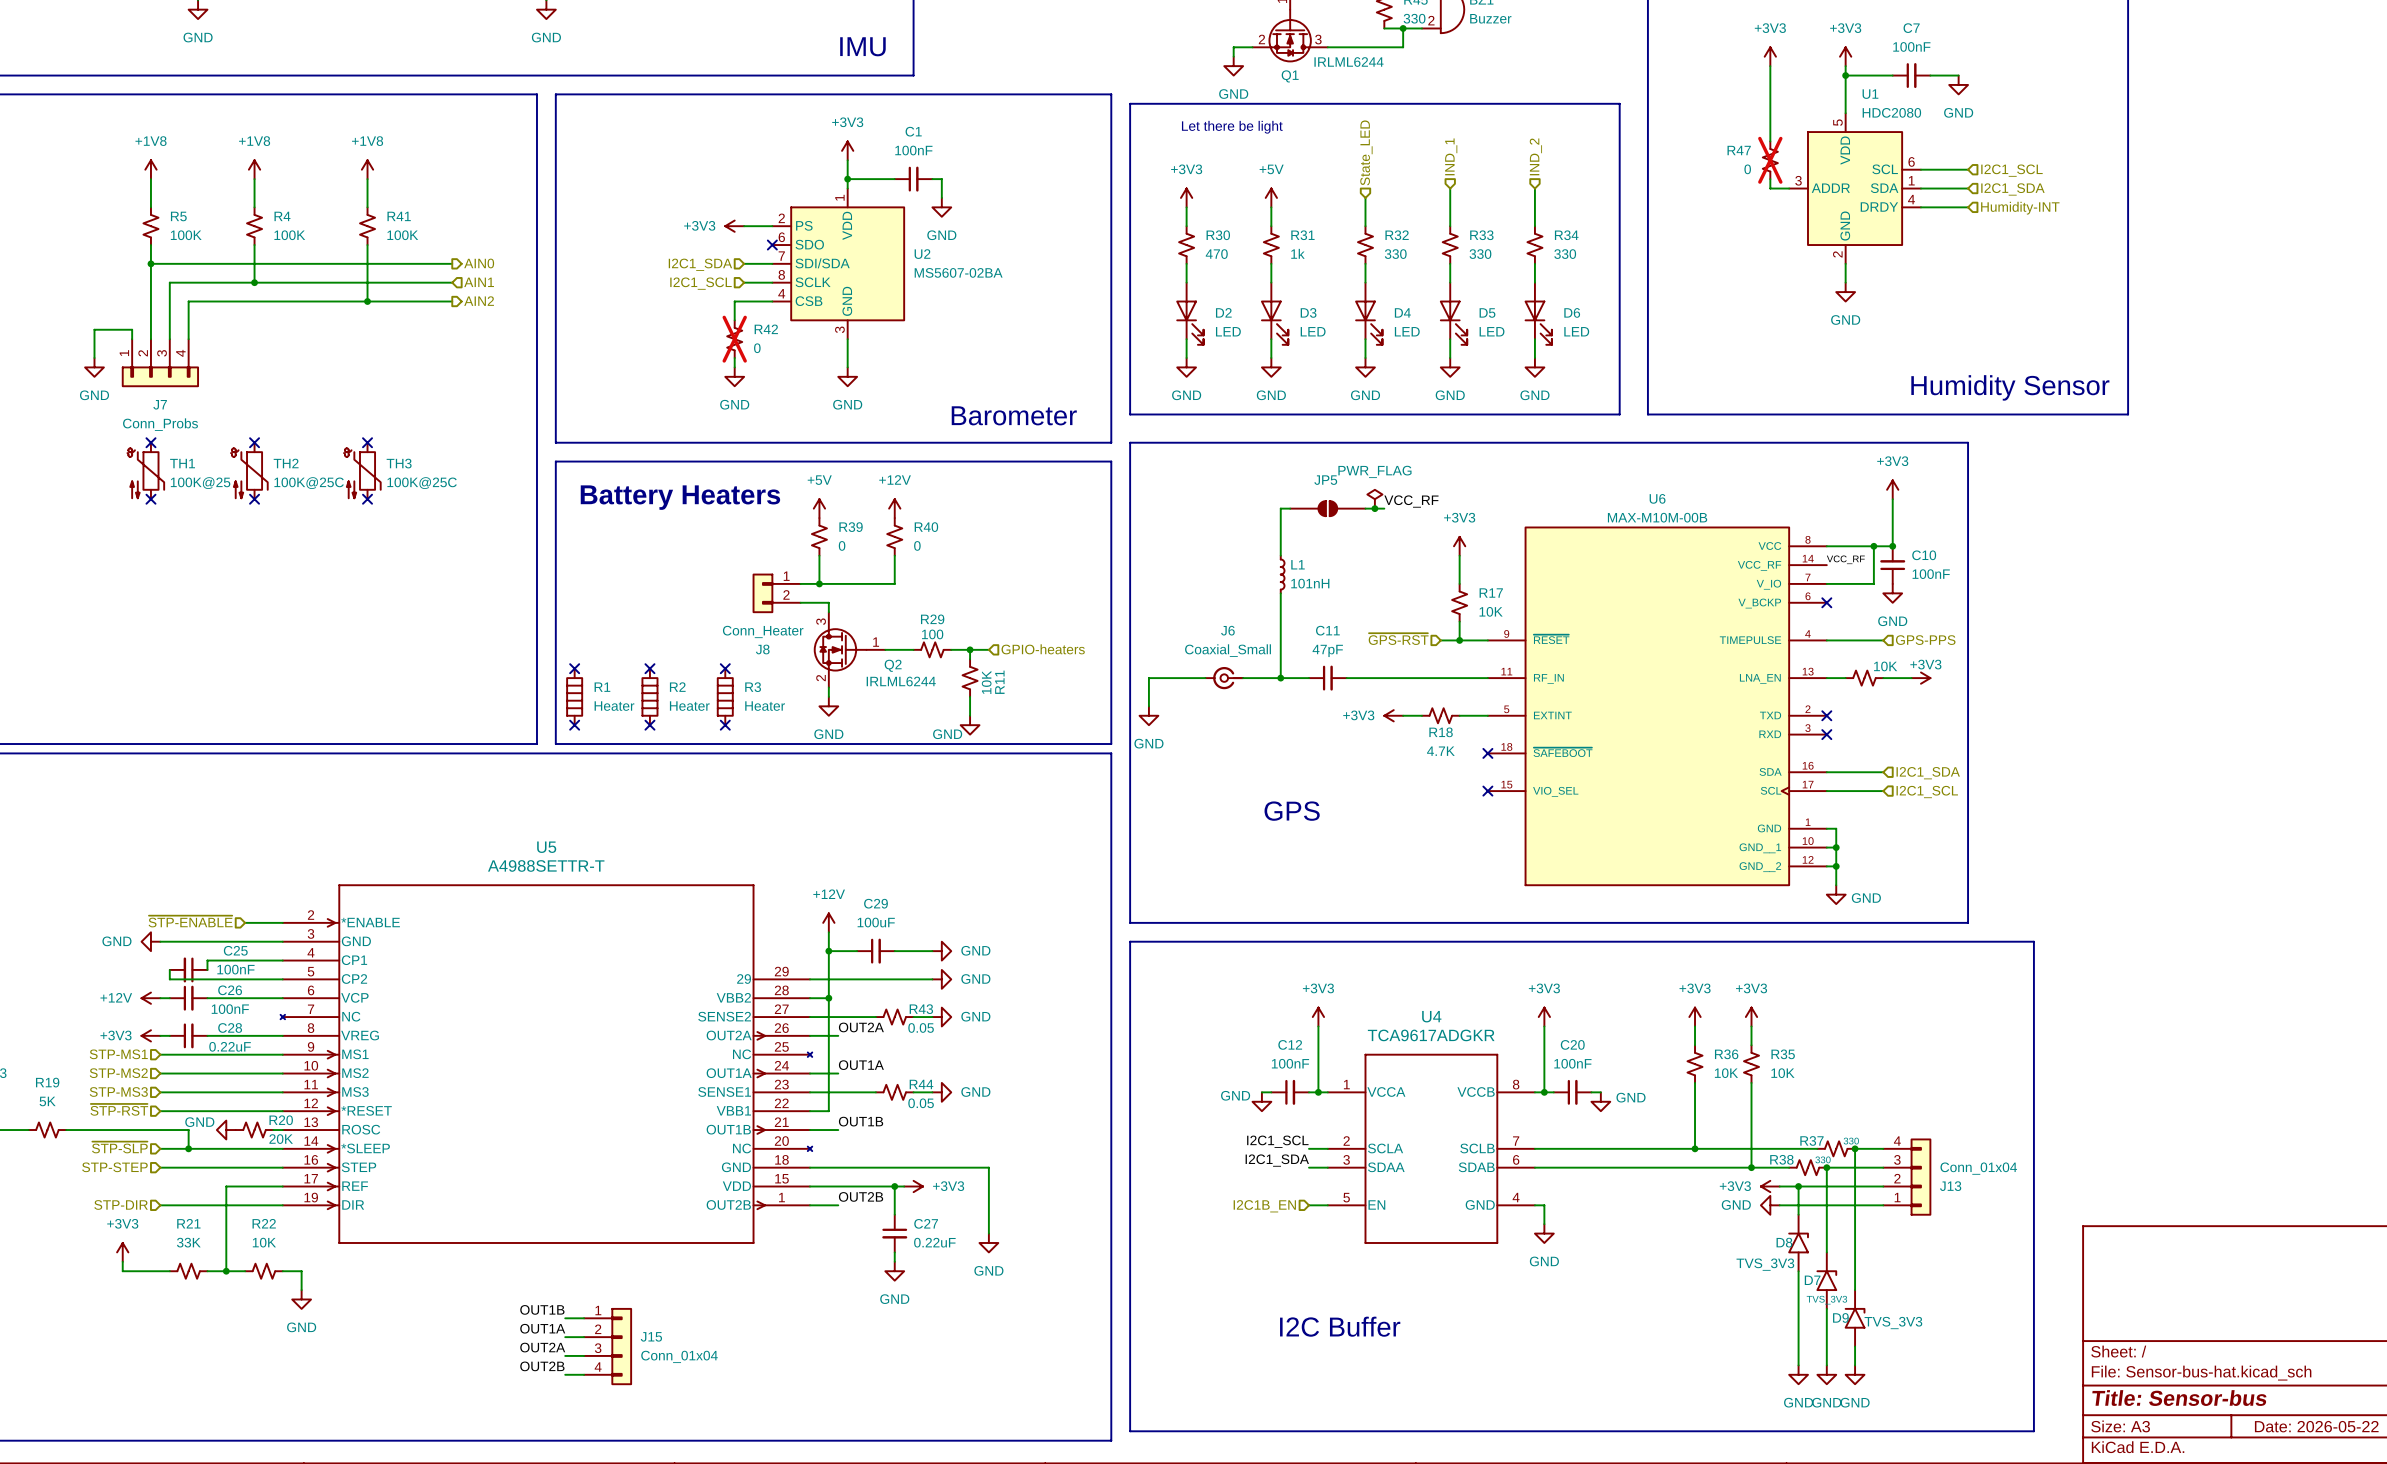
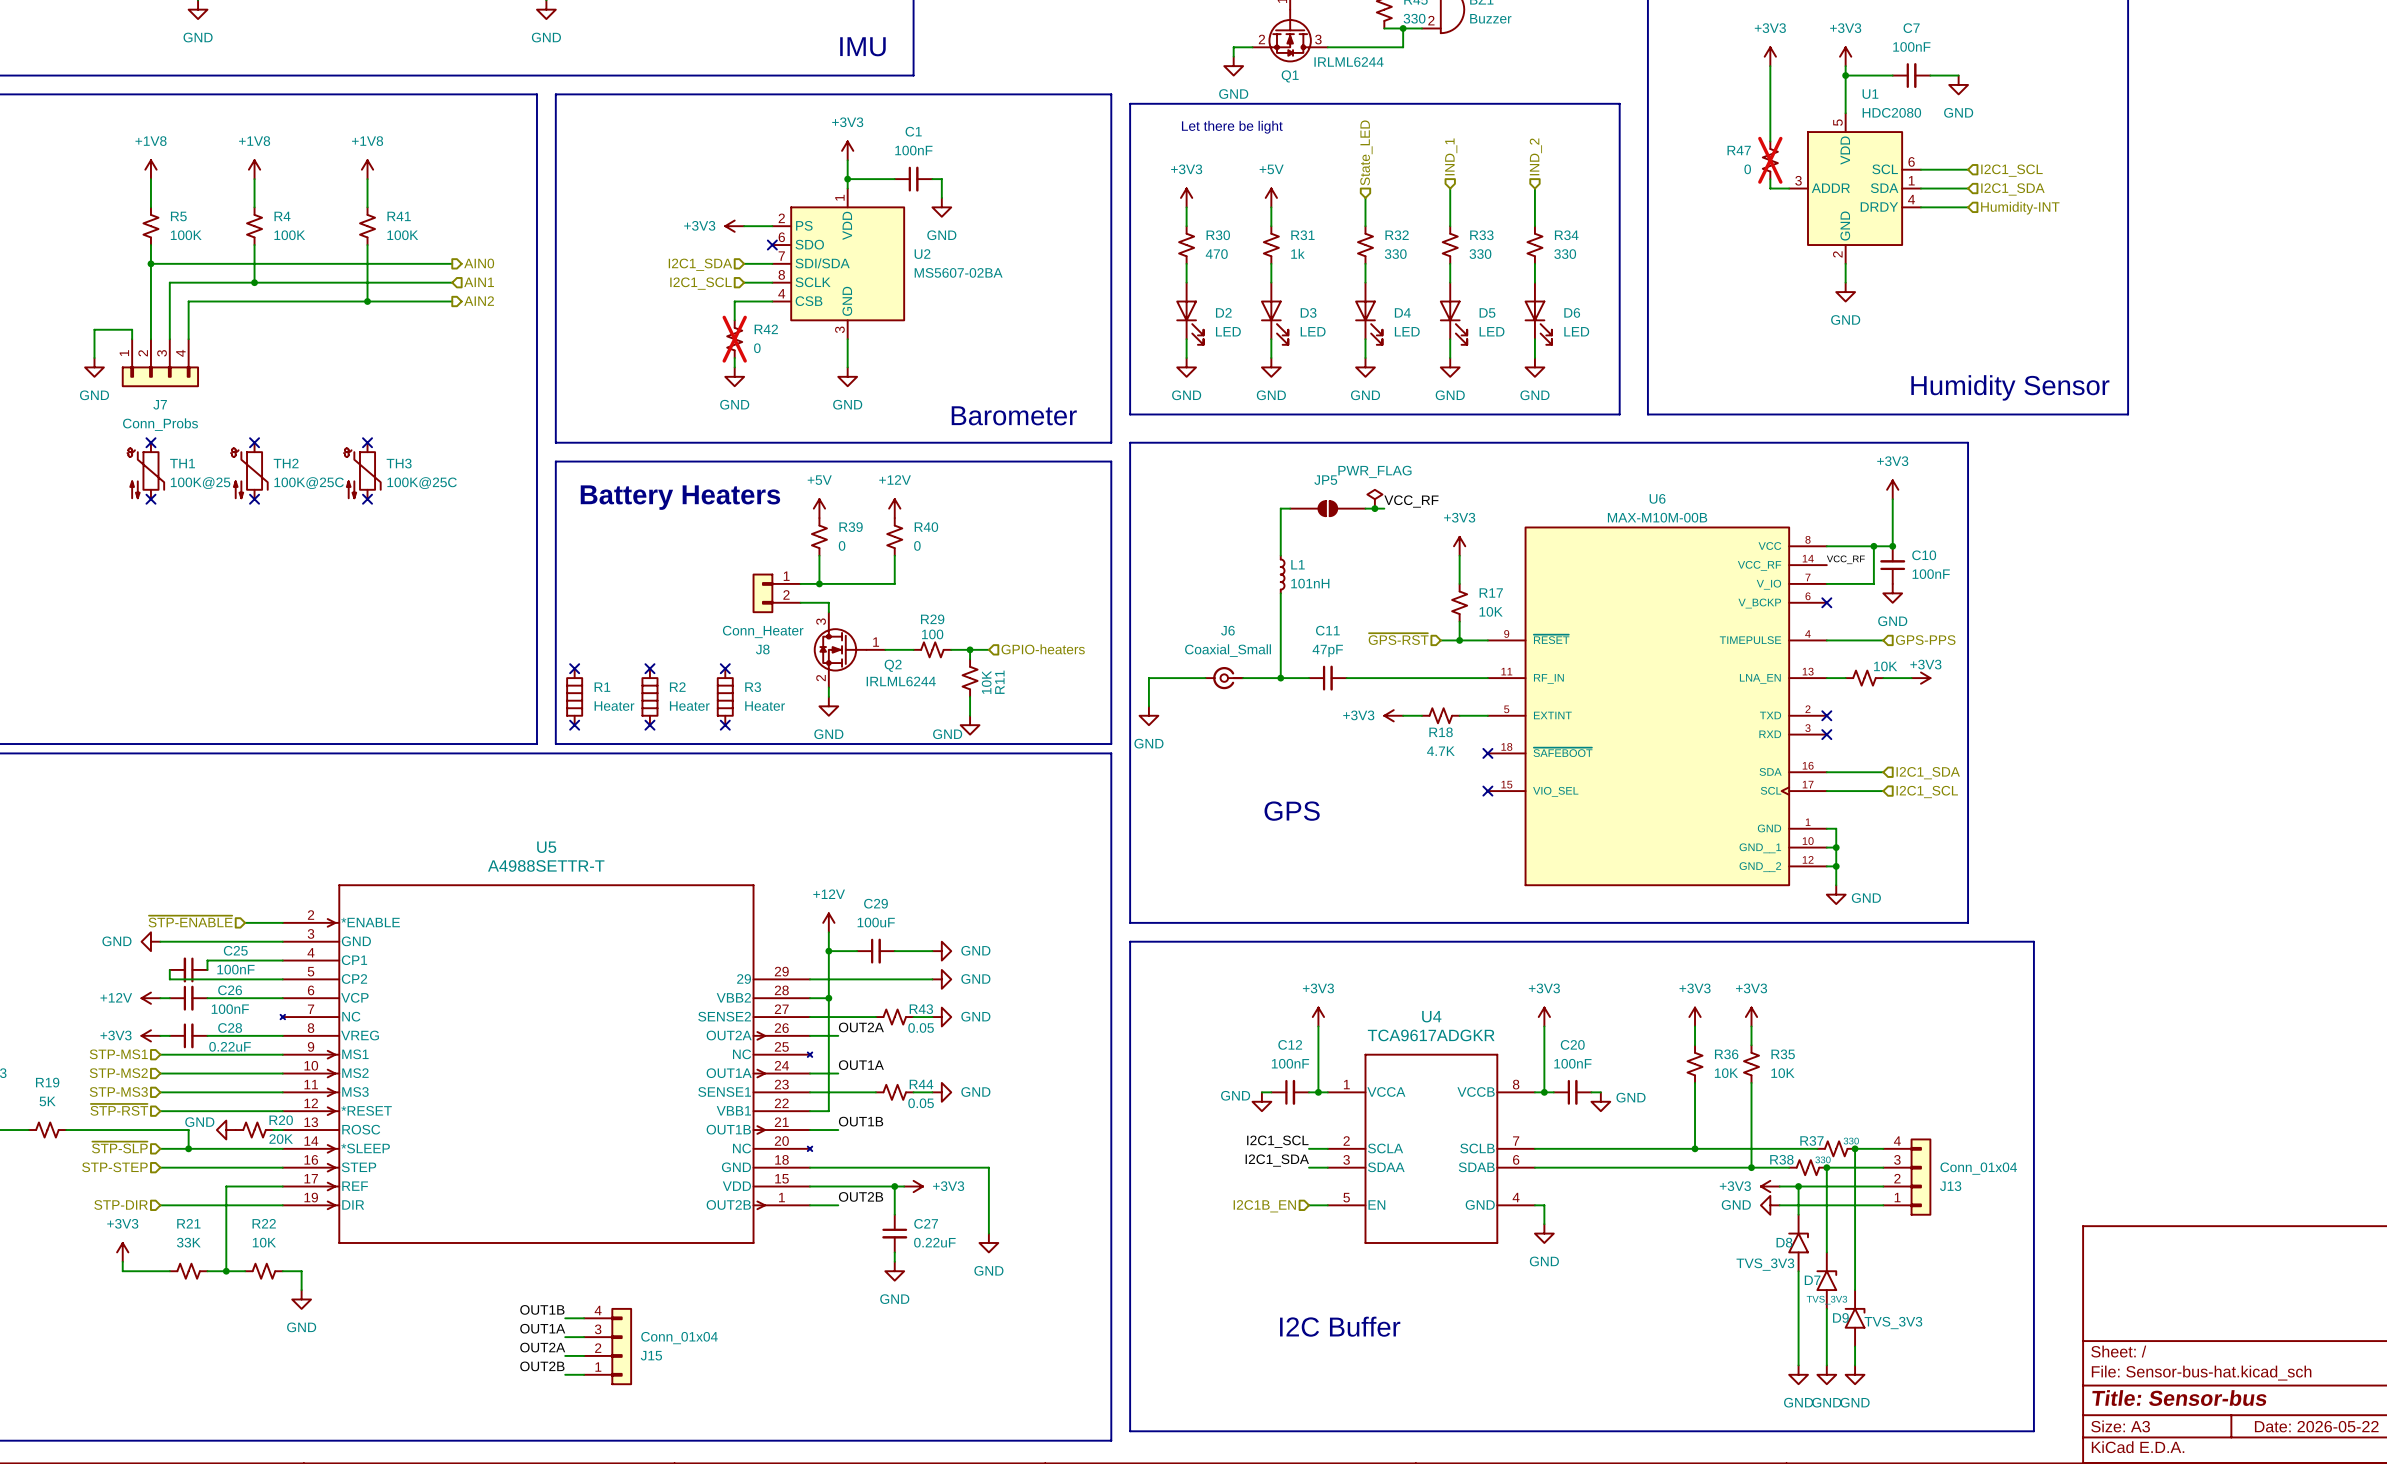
J15 flip: as is (621, 1346) -> up-down (621, 1346)

